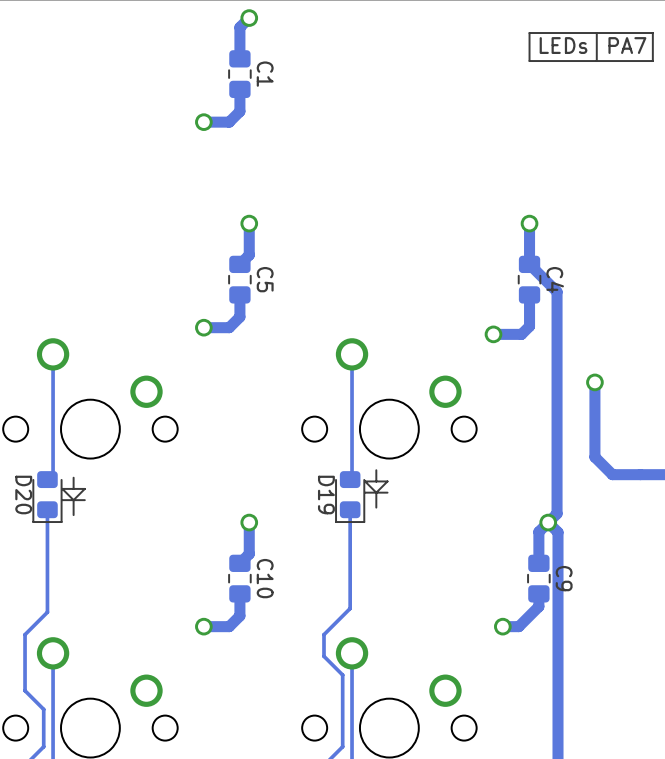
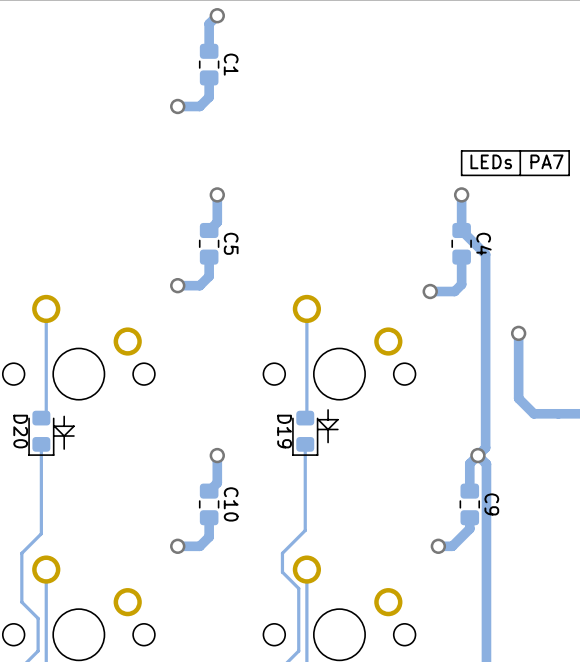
line: (596, 33) (596, 61) -> (520, 150) (520, 175)
line: (652, 33) (529, 33) (529, 61) (652, 61) (652, 33) -> (569, 150) (461, 150) (461, 175) (569, 175) (569, 150)
text position: LEDs (563, 45) -> LEDs (491, 161)
text position: PA7 (627, 45) -> PA7 (546, 161)

